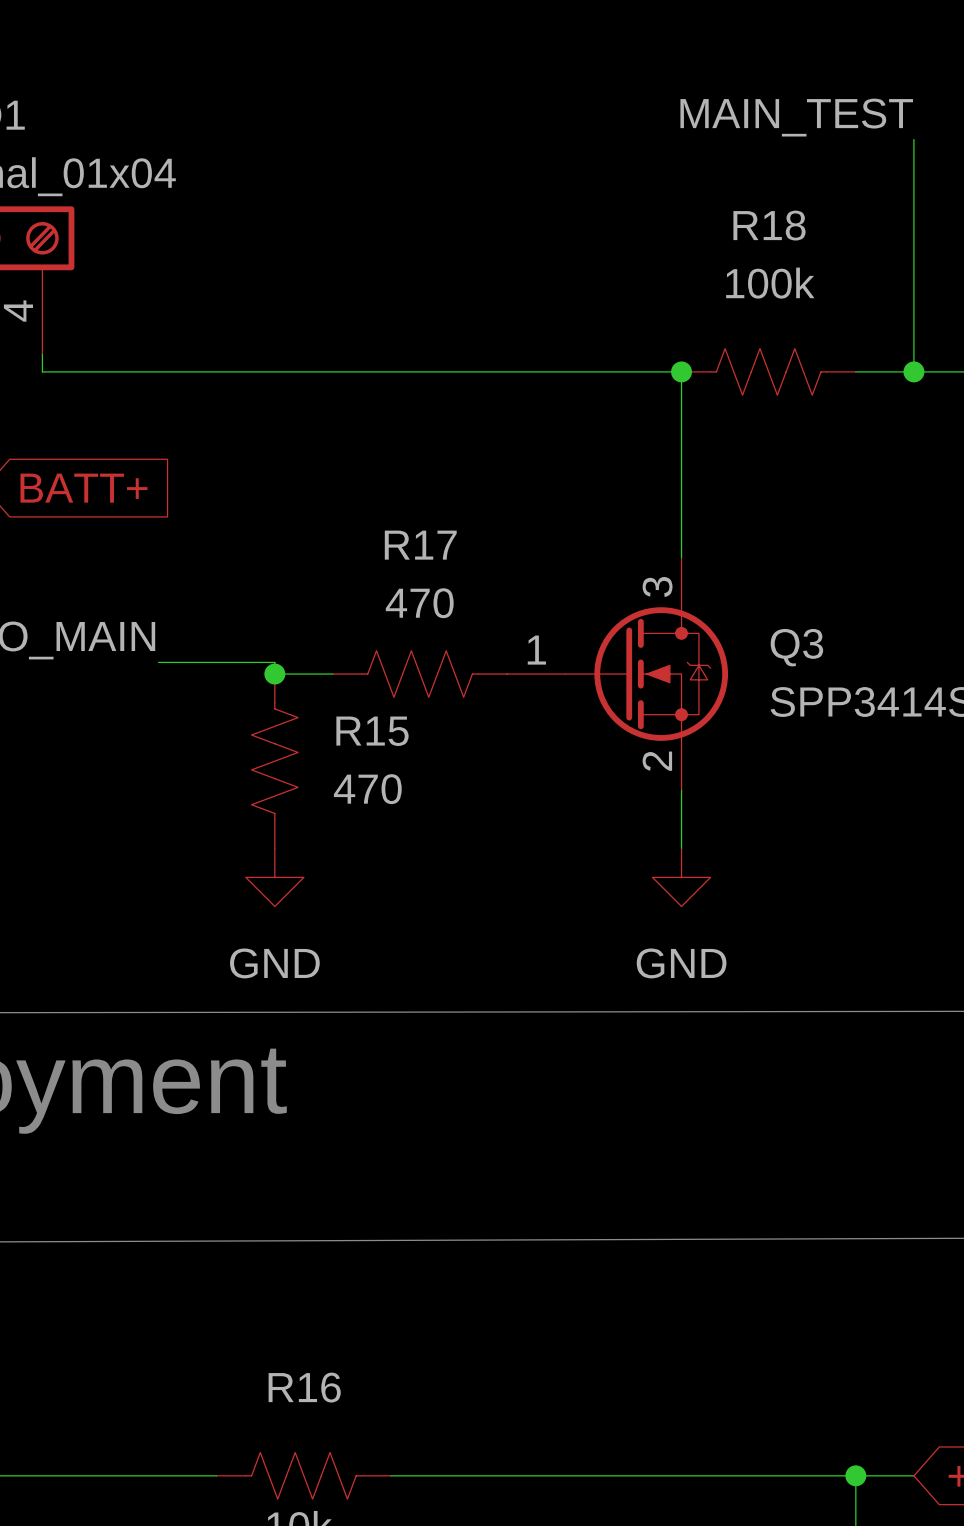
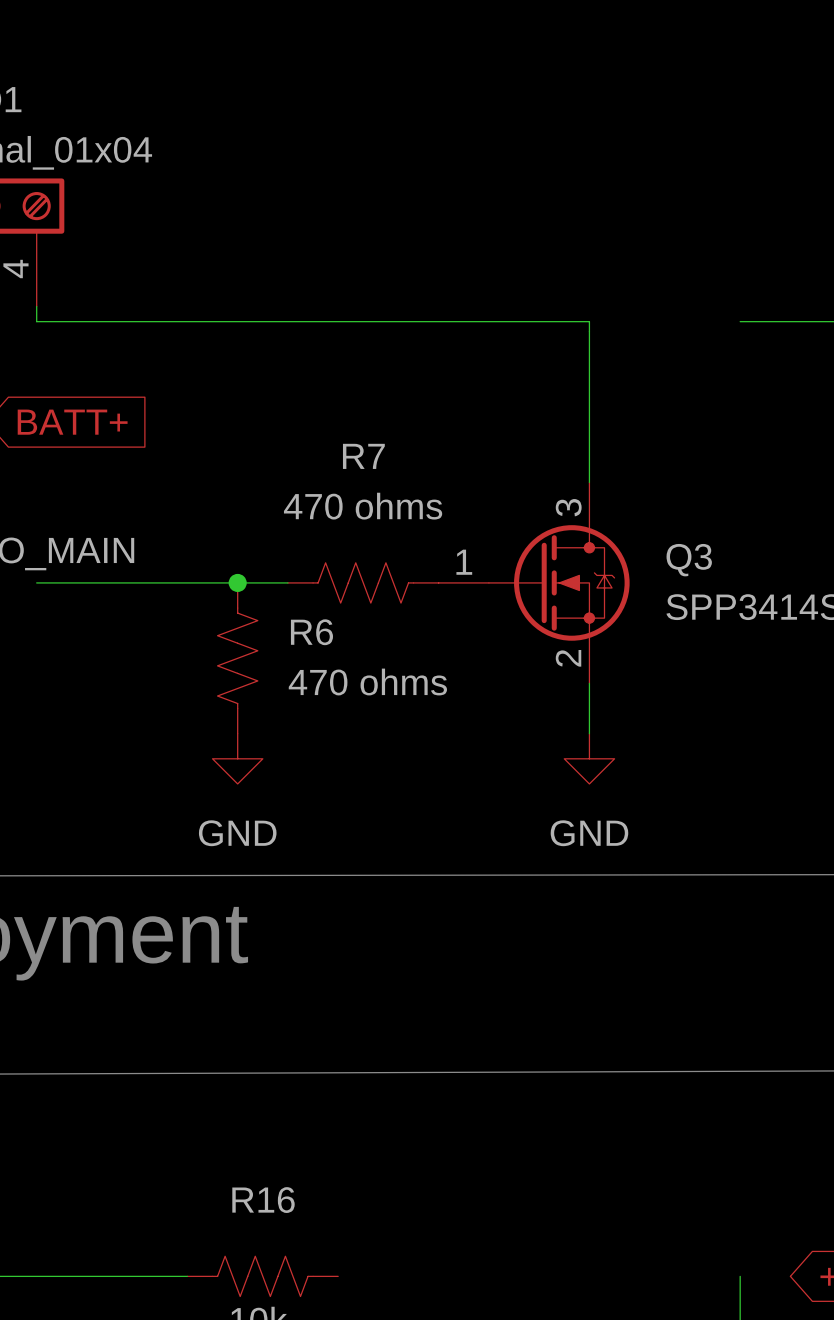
label: MAIN_TEST (796, 117) -> none
wire: (913, 139) (913, 371) -> none
junction: (681, 371) -> none
R18: 100k (768, 371) -> none
junction: (913, 371) -> none
R17 name: R17 (420, 545) -> R7 (363, 456)
R17 value: 470 (419, 603) -> 470 ohms (363, 506)
wire: (158, 662) (274, 662) (274, 674) -> (36, 582) (237, 582)
R15 name: R15 (372, 731) -> R6 (311, 632)
R15 value: 470 (367, 789) -> 470 ohms (367, 682)
wire: (391, 1475) (913, 1475) -> none
junction: (855, 1475) -> none

